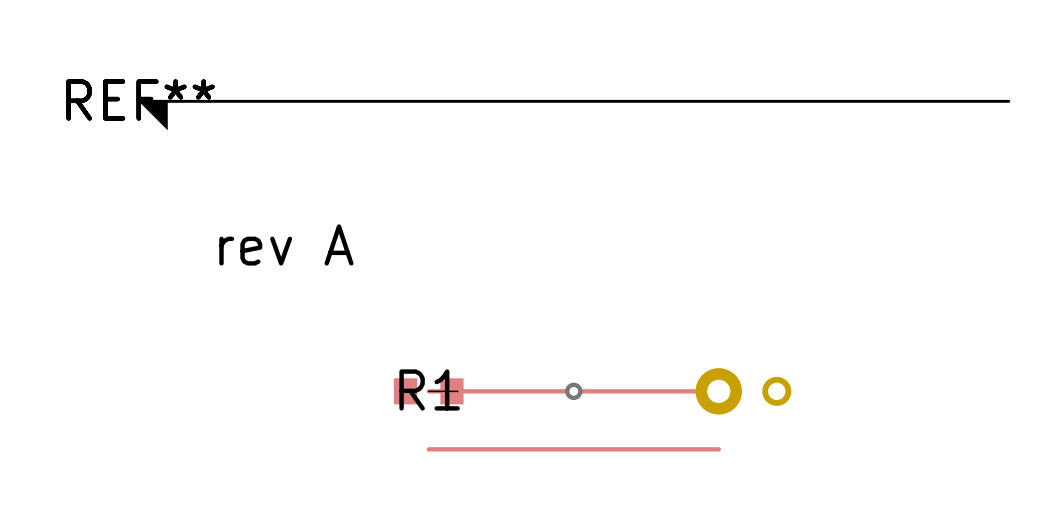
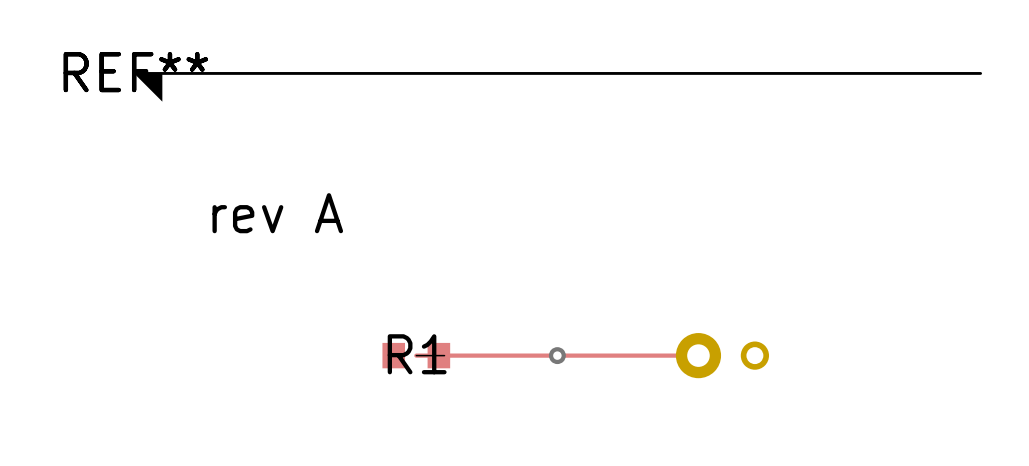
track: (428, 449) (718, 449) -> none

